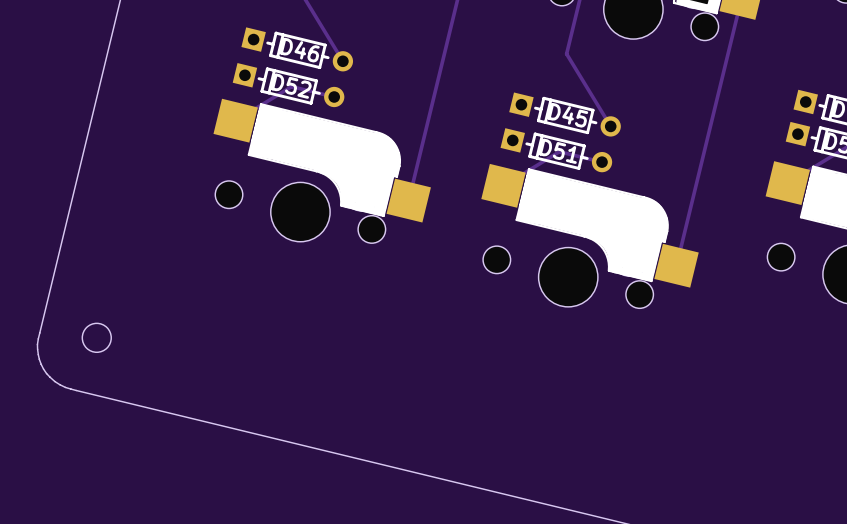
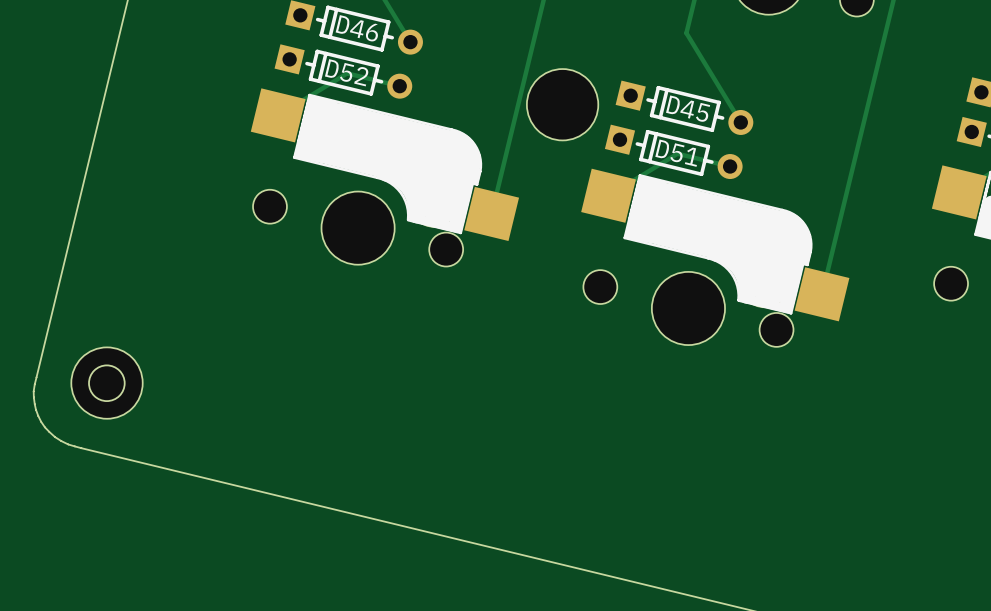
part: none -> (562, 104)
part: none -> (107, 383)

